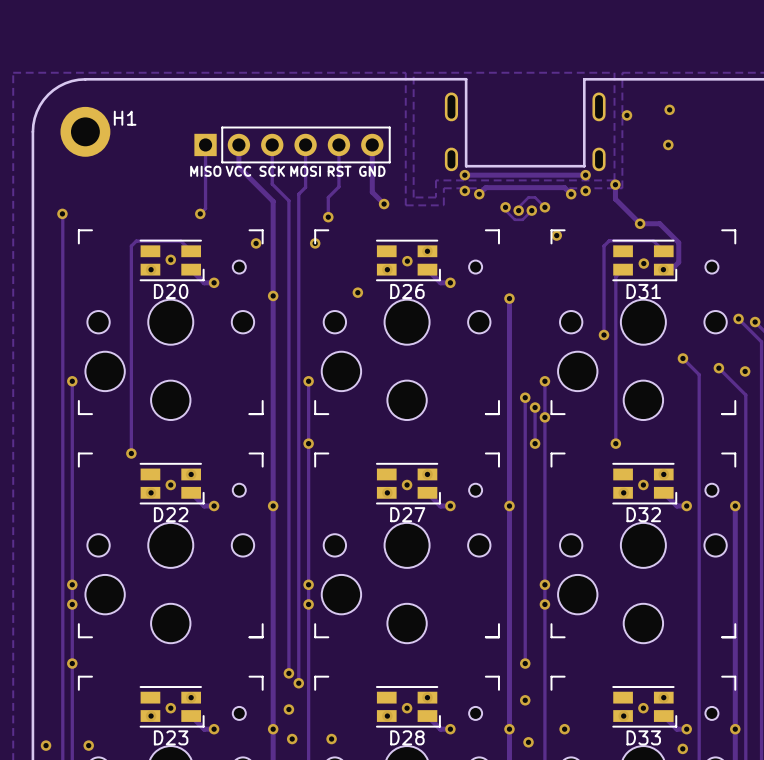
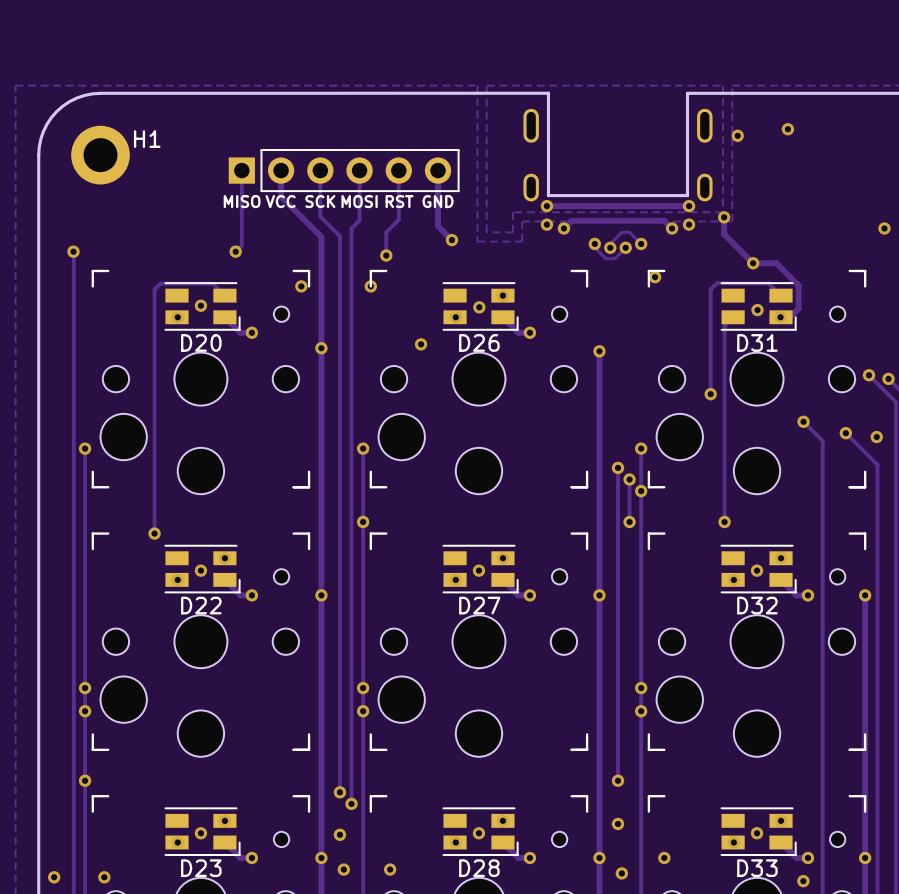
via: (668, 144) -> none
via: none -> (884, 228)

